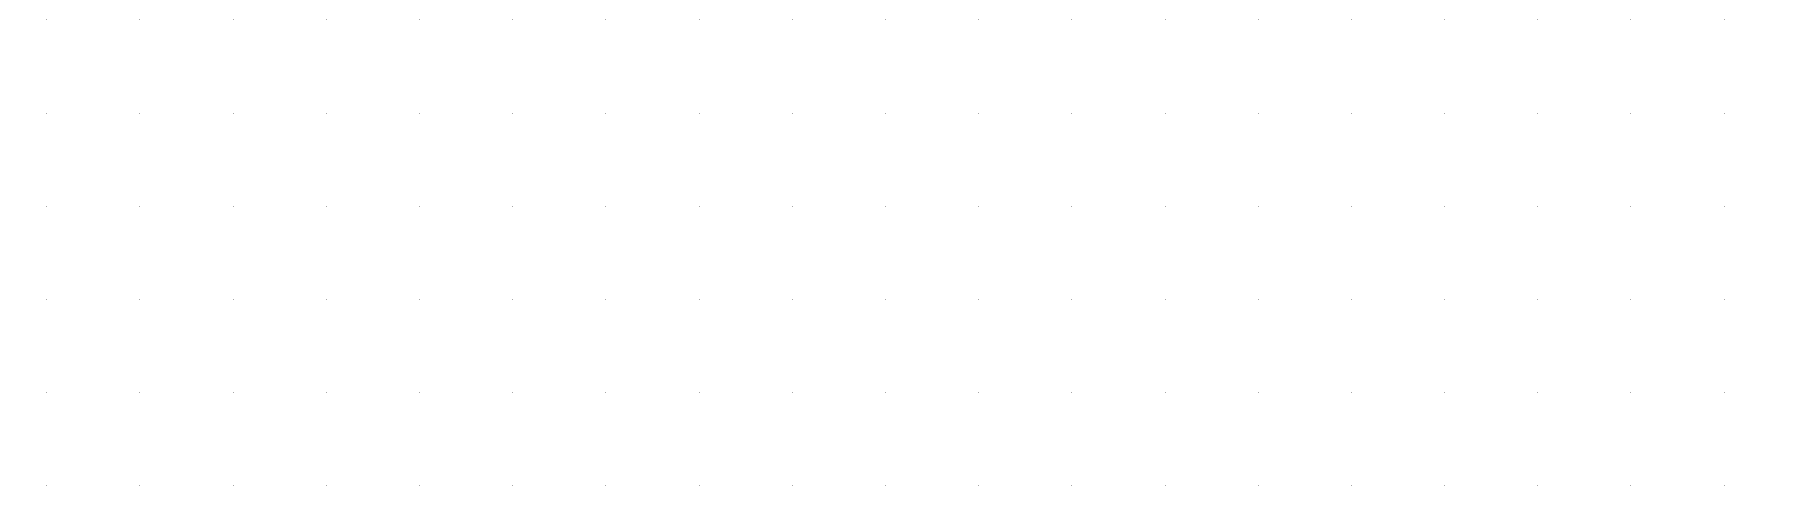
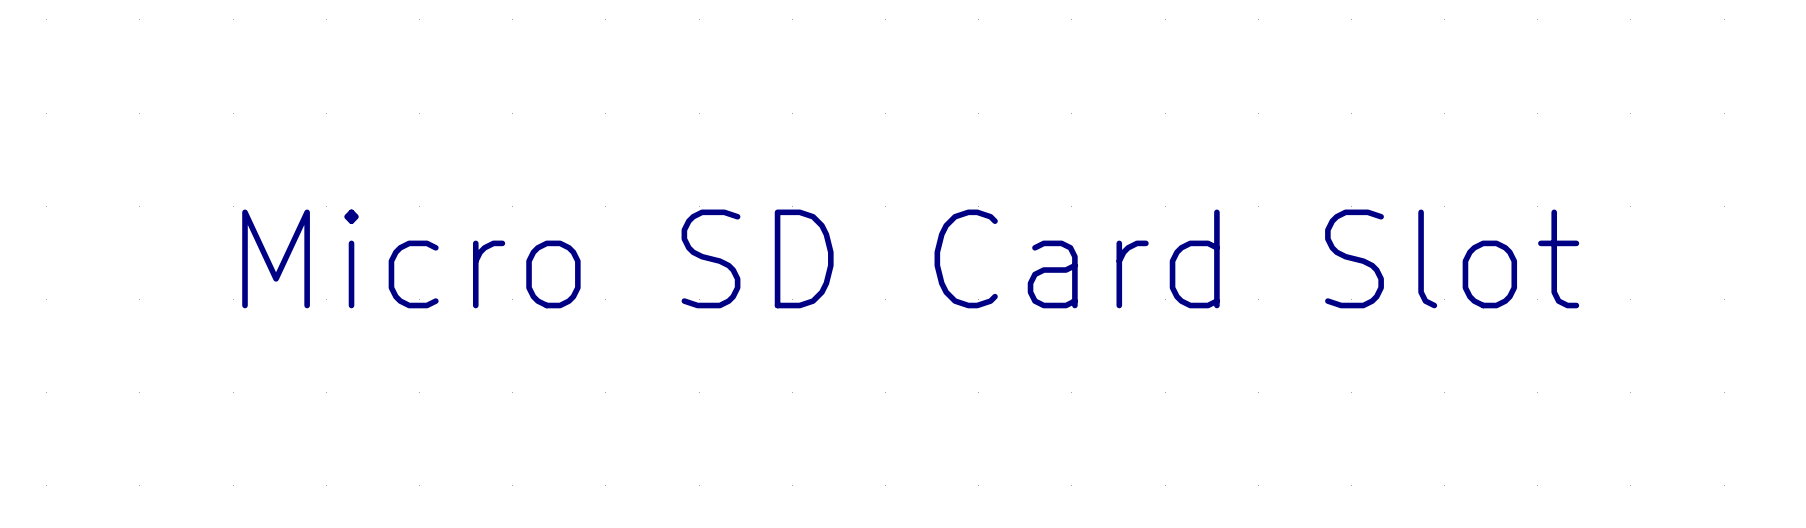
text: none -> Micro SD Card Slot (910, 258)

